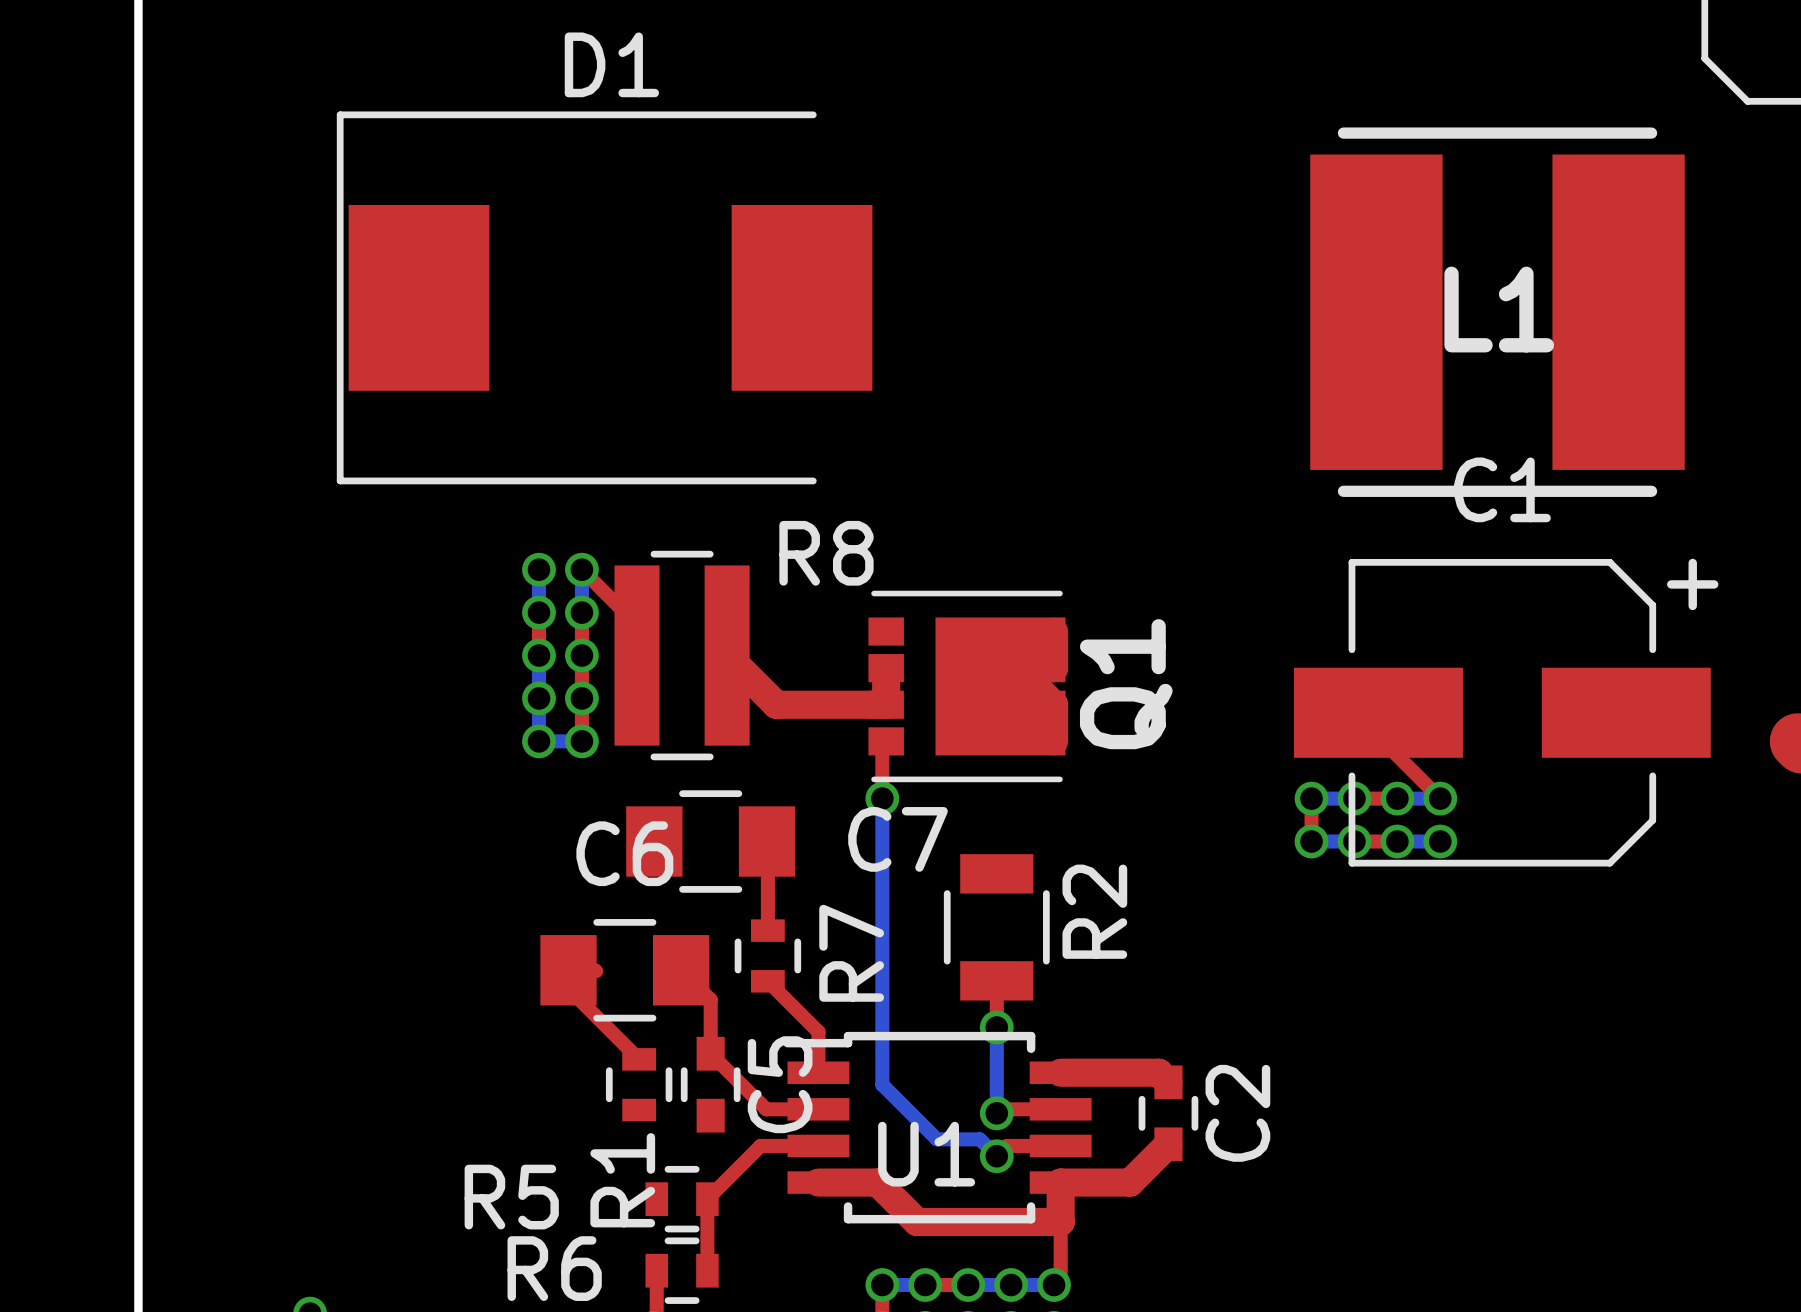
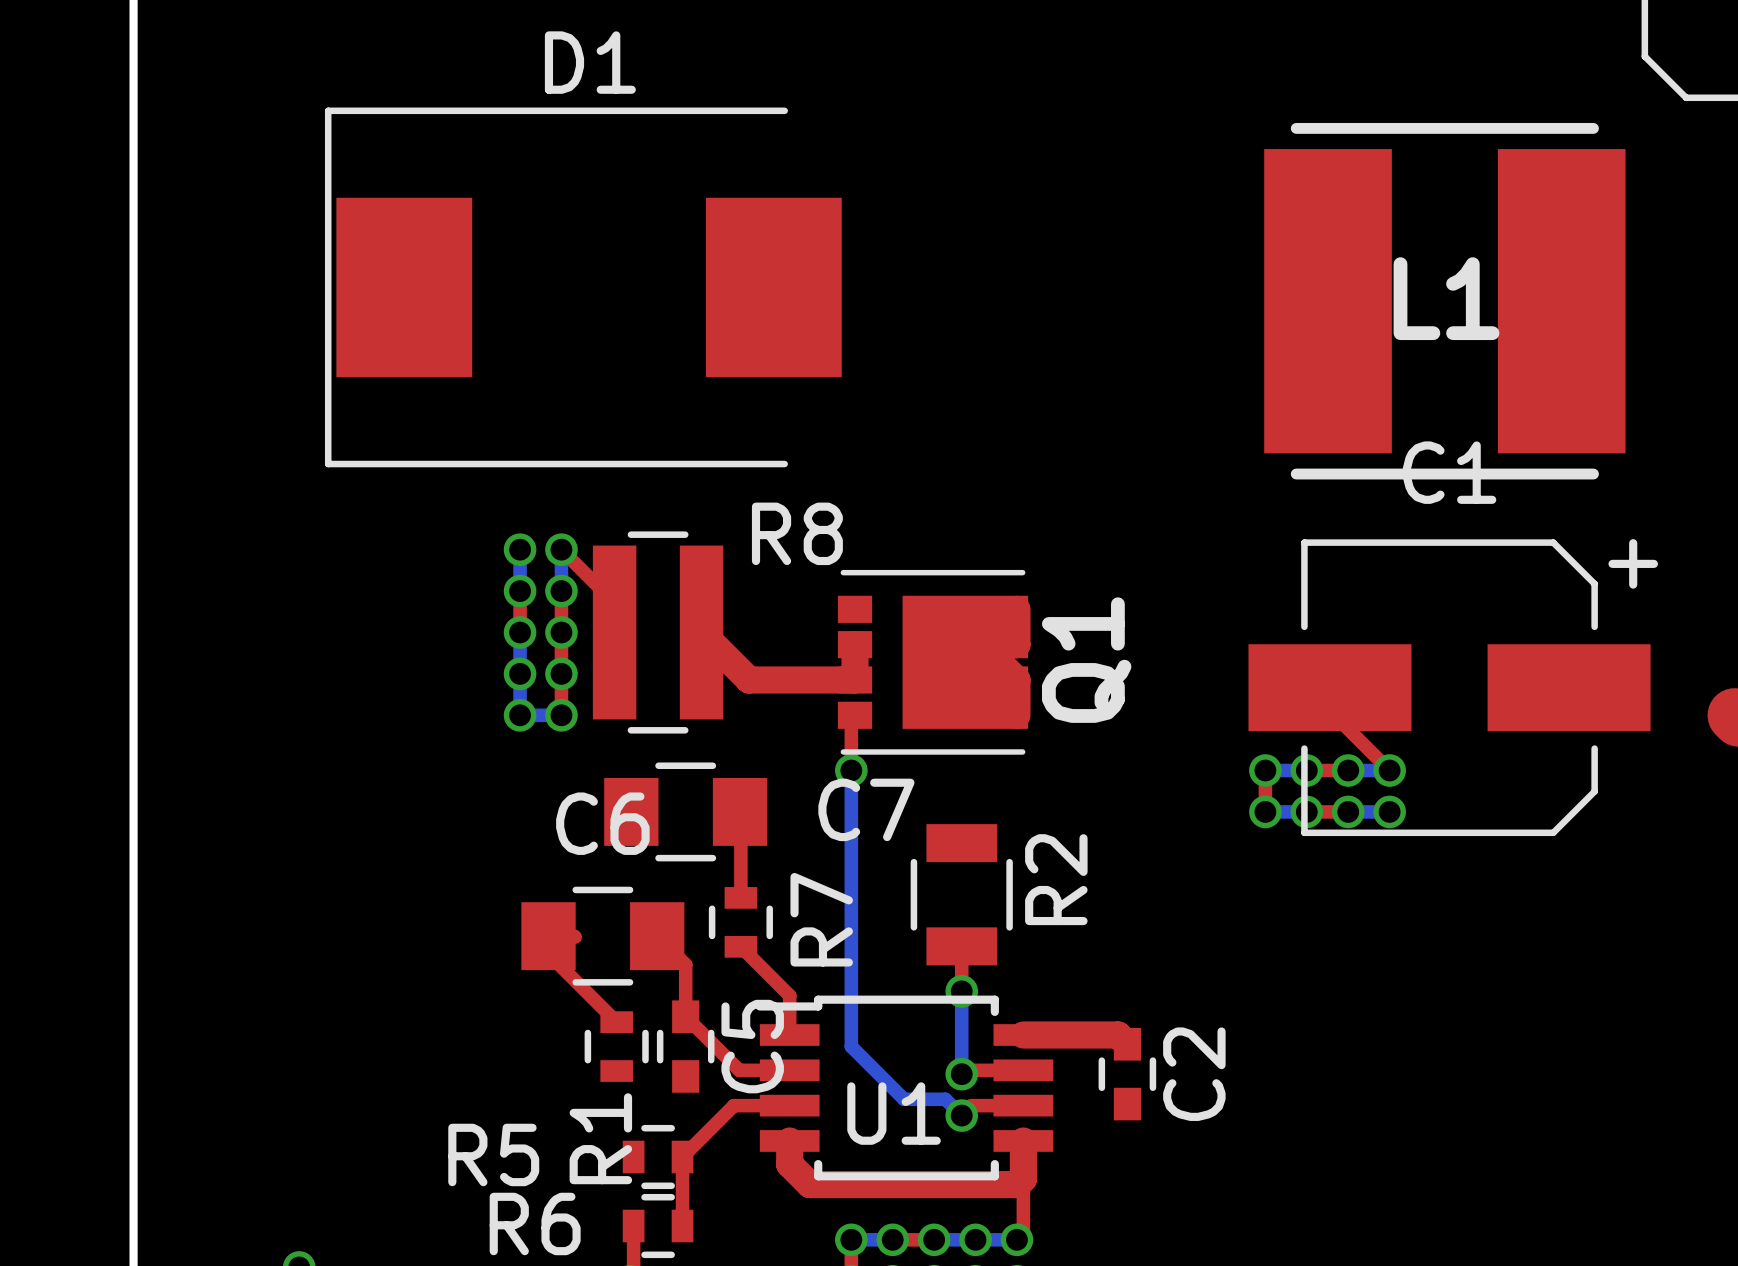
top track: (1168, 1144) (1130, 1182) (1060, 1182) -> none
top track: (818, 1182) (877, 1182) (917, 1221) (1060, 1221) -> (789, 1140) (789, 1164) (809, 1184) (1017, 1184) (1023, 1179)

